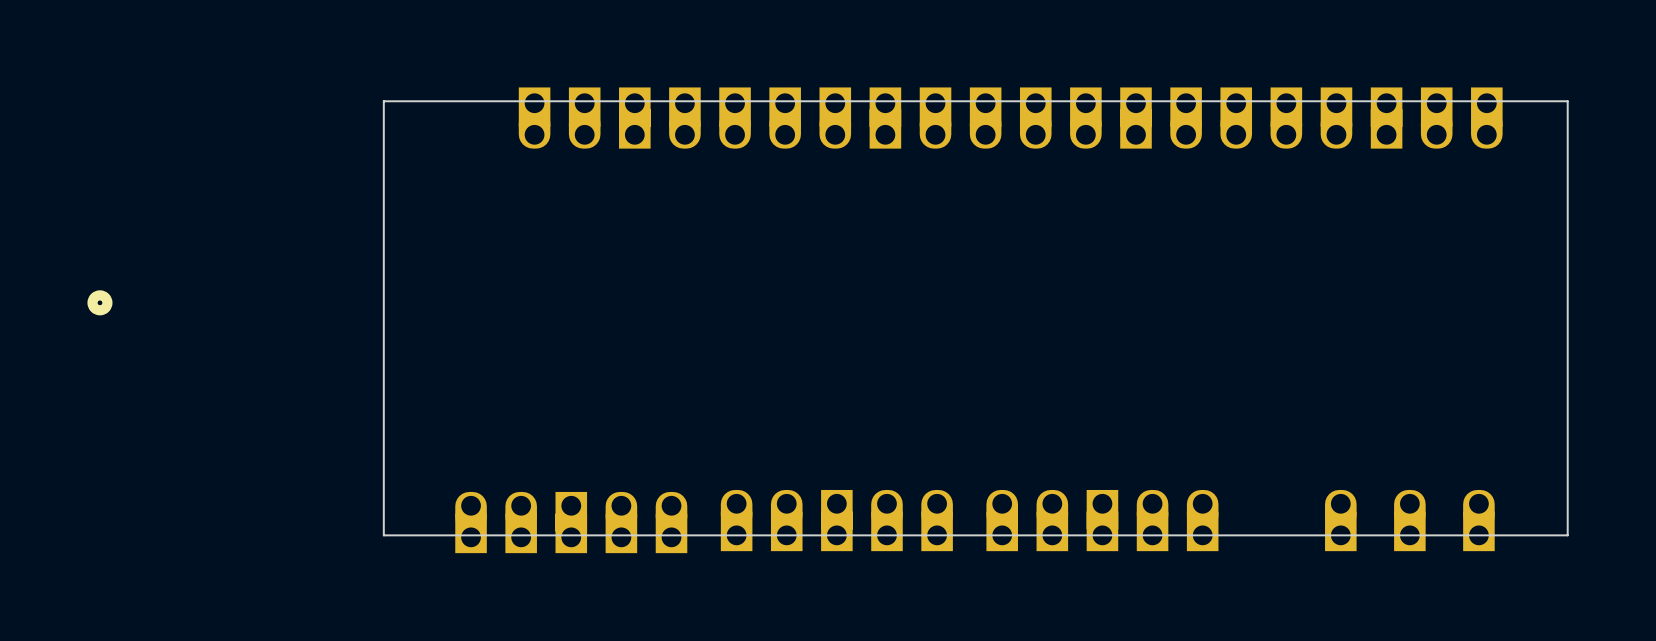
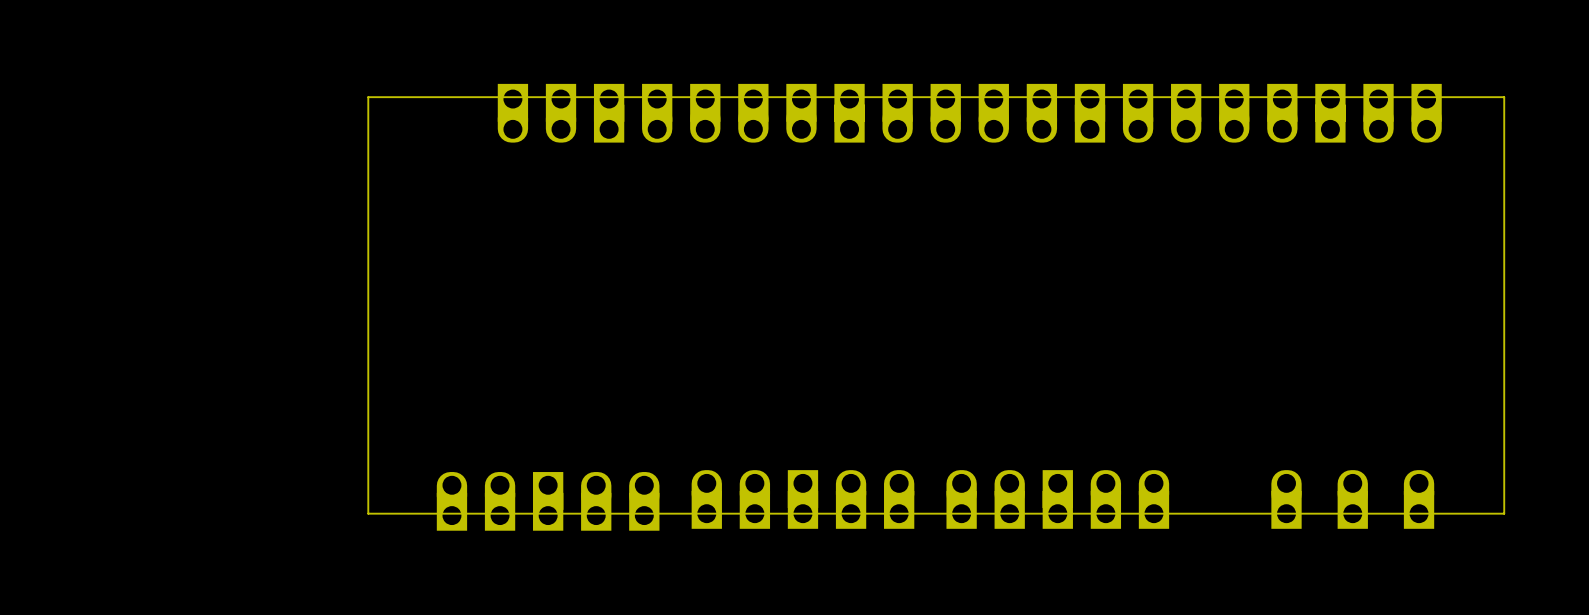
part: (99, 302) -> none

